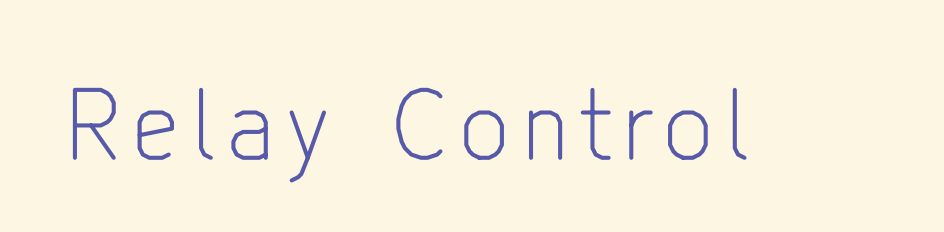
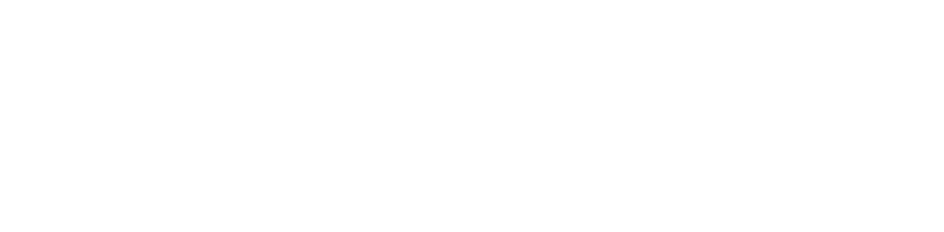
text: Relay Control (409, 135) -> none

